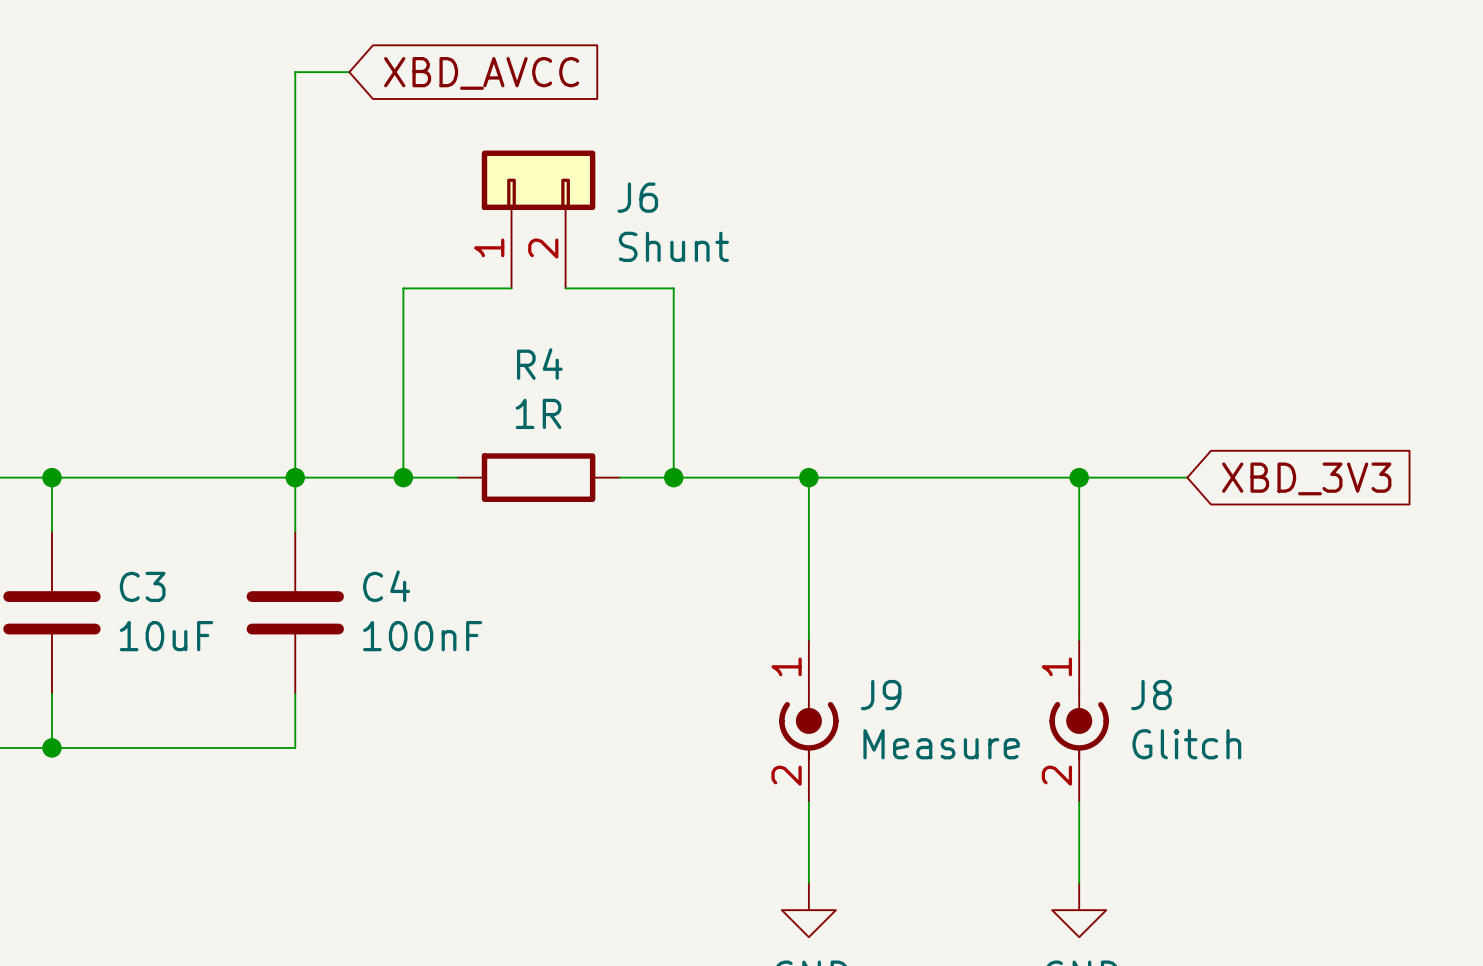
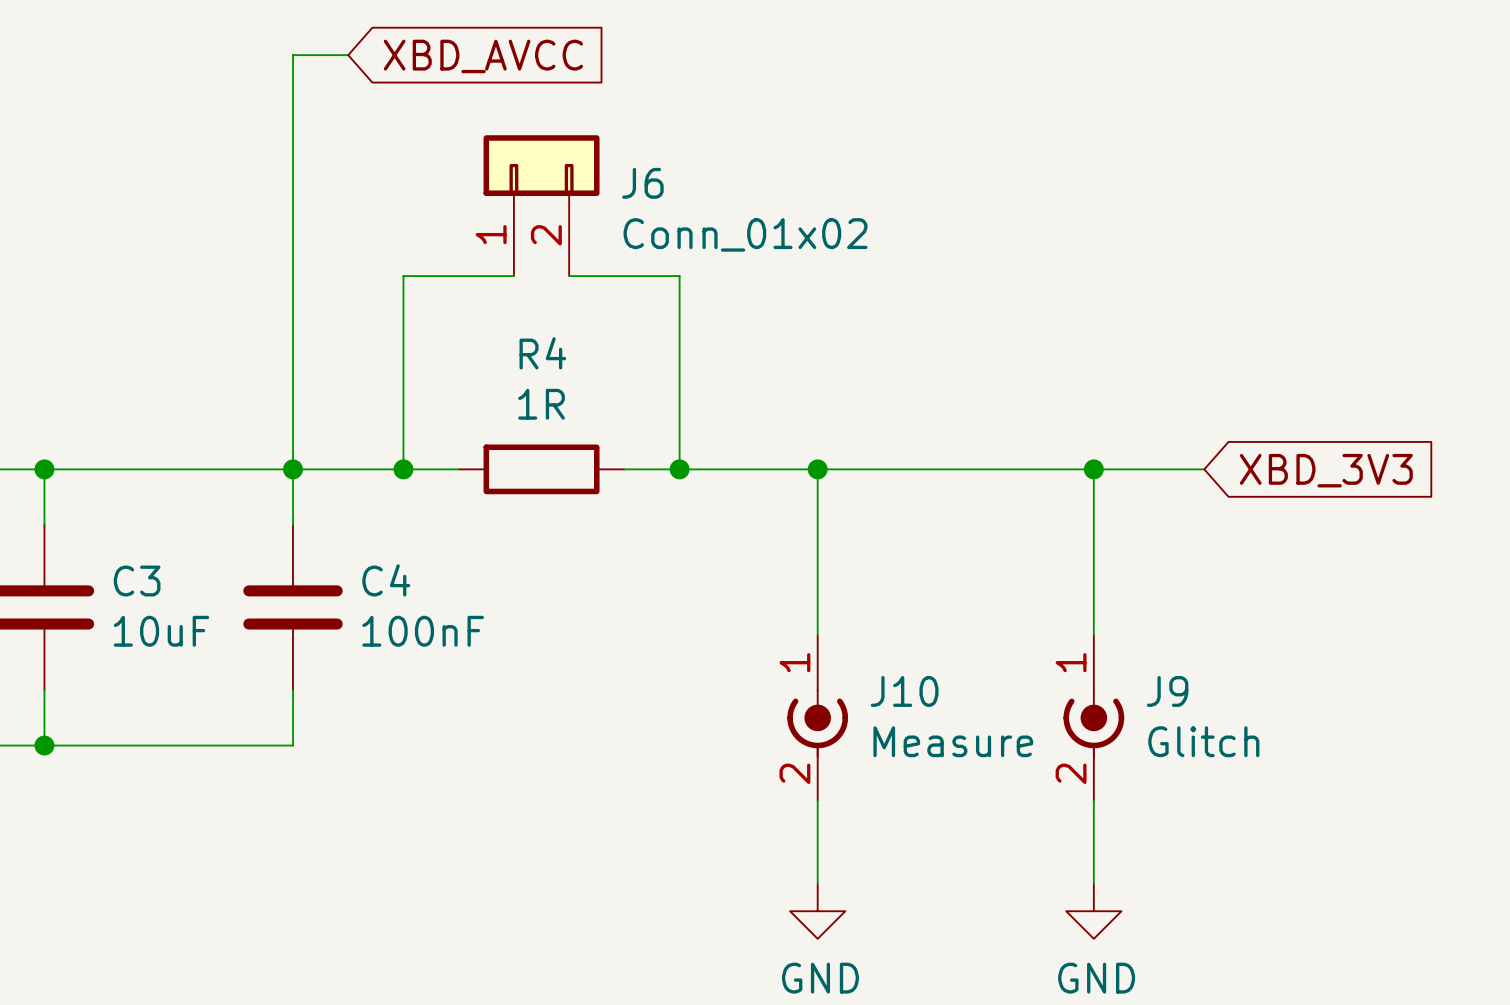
J6 value: Shunt (673, 246) -> Conn_01x02 (745, 234)
J9 name: J9 (881, 695) -> J10 (904, 691)
J8 name: J8 (1151, 695) -> J9 (1167, 691)

